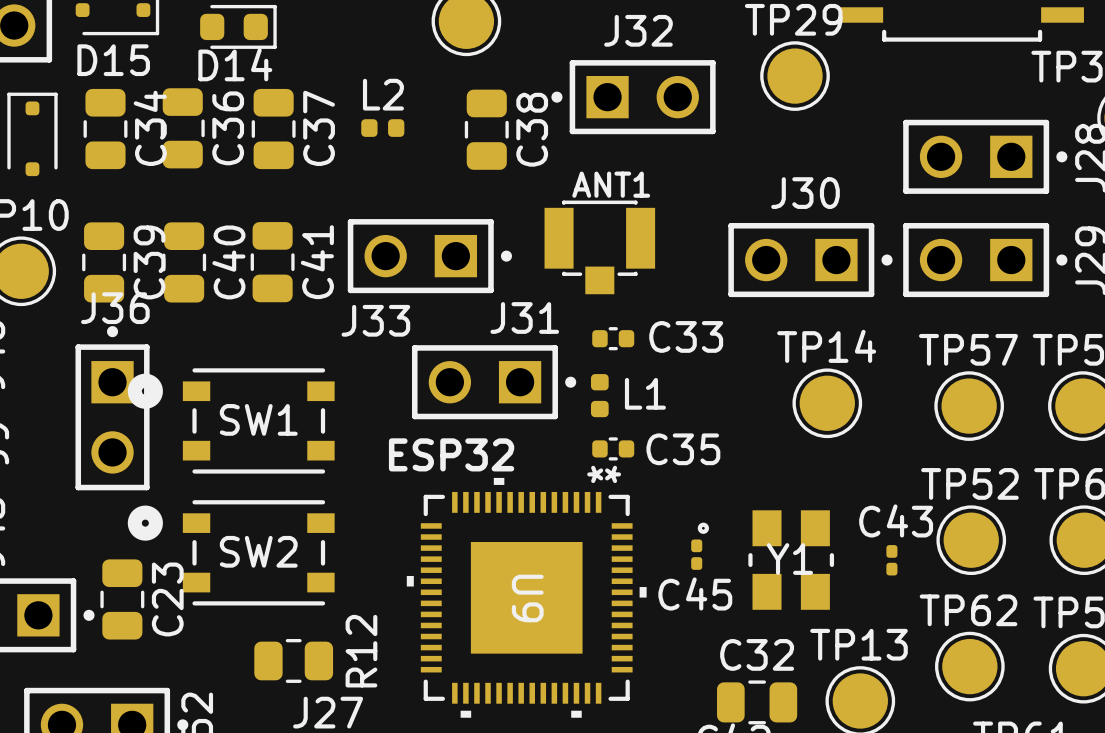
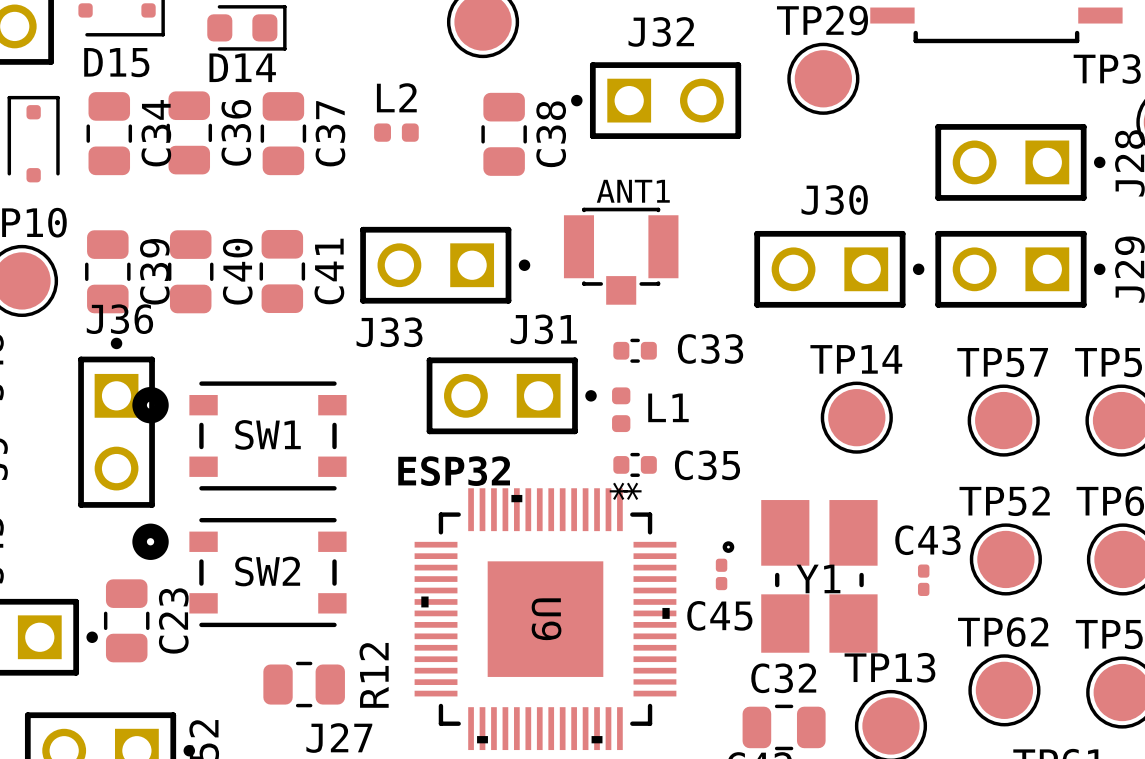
U9 footprint: [406, 477, 647, 718] -> [414, 488, 677, 751]
Y1 footprint: [697, 510, 835, 610] -> [722, 500, 878, 653]

